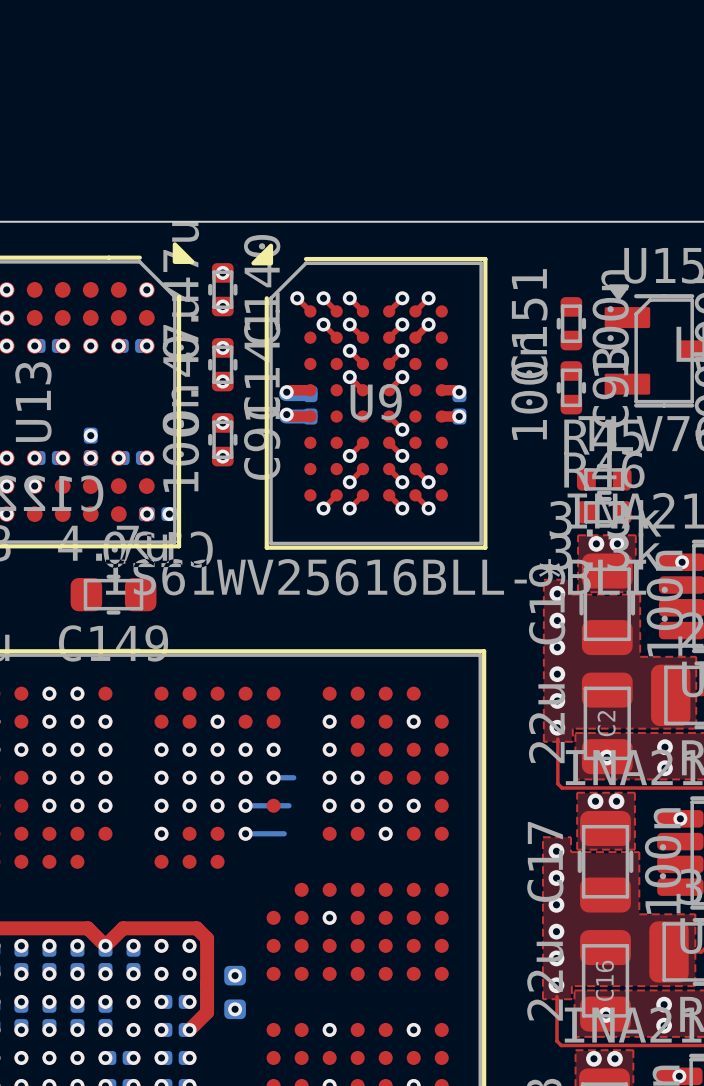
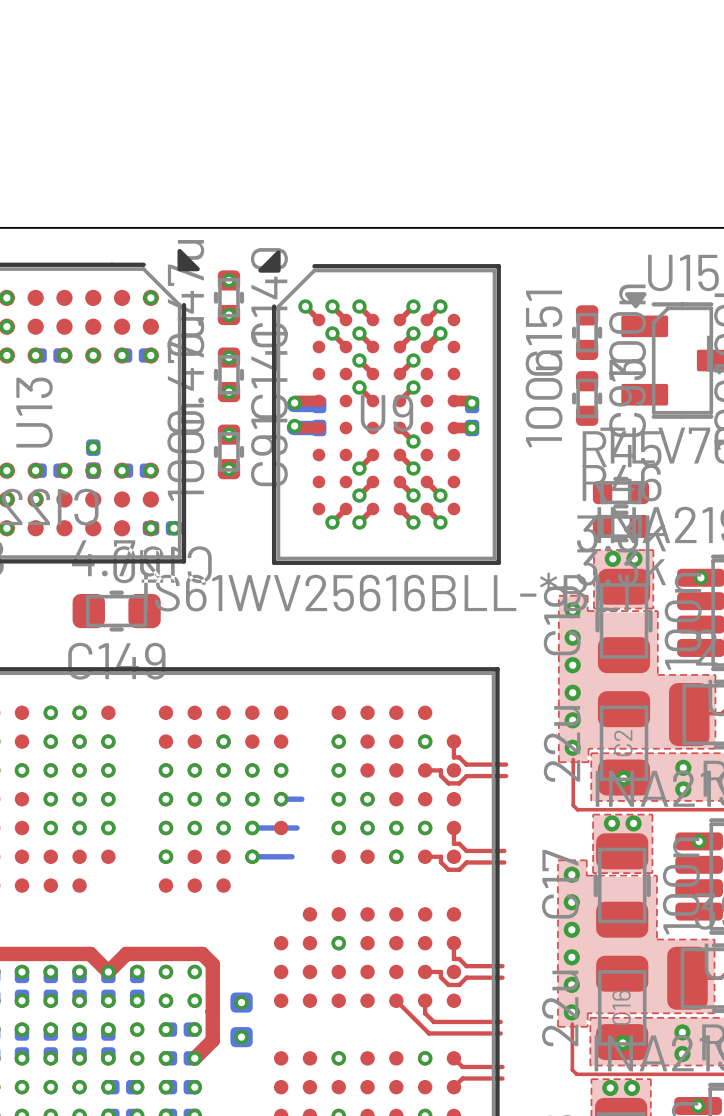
top track: none -> (453, 741) (453, 757) (459, 757) (466, 764) (506, 764)
top track: none -> (425, 770) (440, 770) (440, 775) (448, 783) (459, 783) (466, 776) (506, 776)
top track: none -> (453, 827) (453, 843) (459, 843) (466, 850) (504, 850)
top track: none -> (425, 856) (440, 856) (440, 862) (448, 869) (459, 869) (466, 862) (504, 862)
top track: none -> (453, 943) (453, 958) (459, 958) (466, 966) (502, 966)
top track: none -> (425, 971) (440, 971) (440, 977) (448, 984) (459, 984) (466, 977) (502, 977)
top track: none -> (396, 1000) (429, 1033) (500, 1033)
top track: none -> (425, 1000) (425, 1013) (433, 1021) (500, 1021)
top track: none -> (453, 1058) (462, 1067) (502, 1067)
top track: none -> (502, 1078) (462, 1078) (453, 1087)

